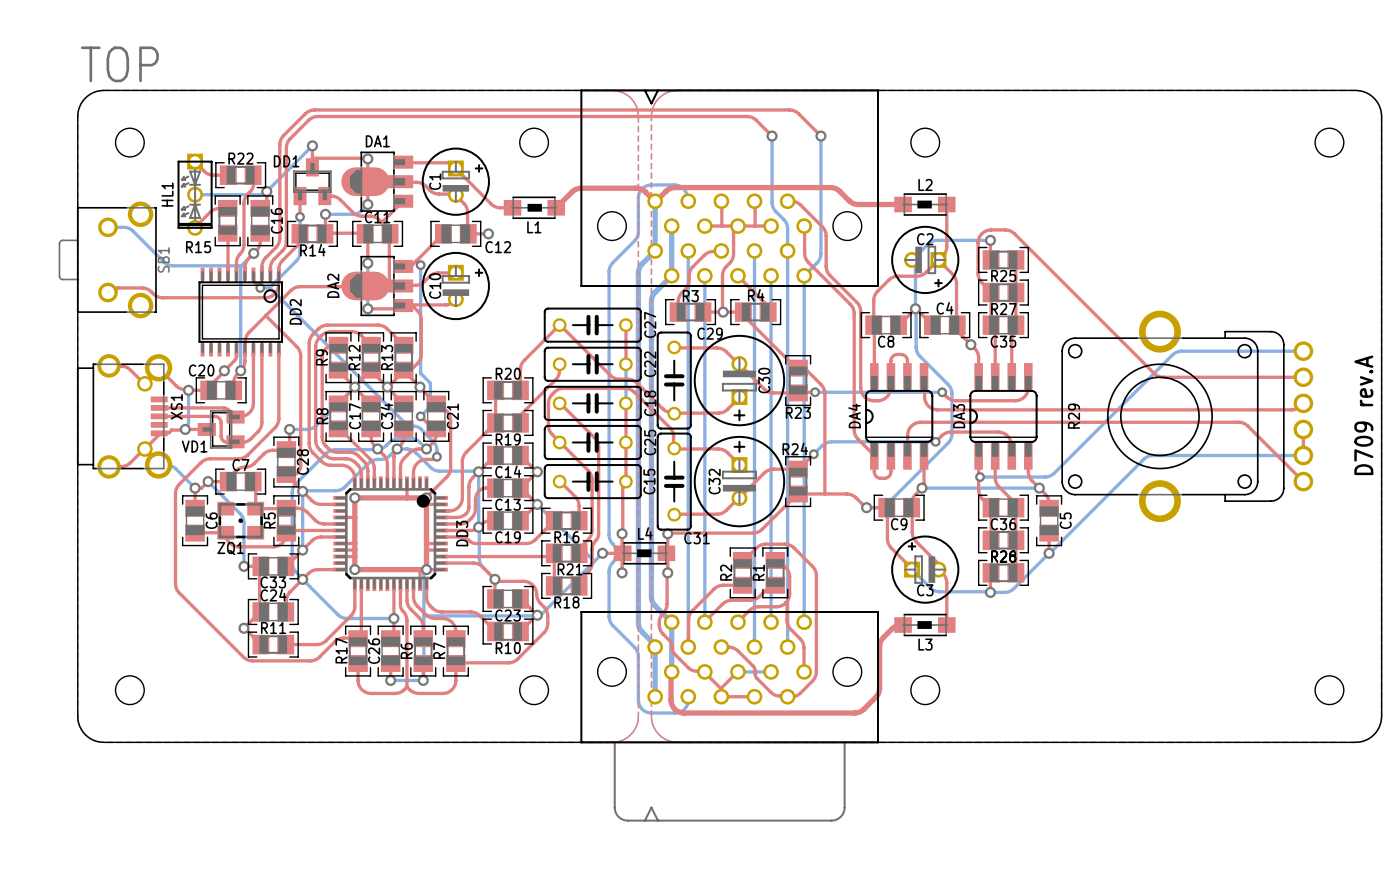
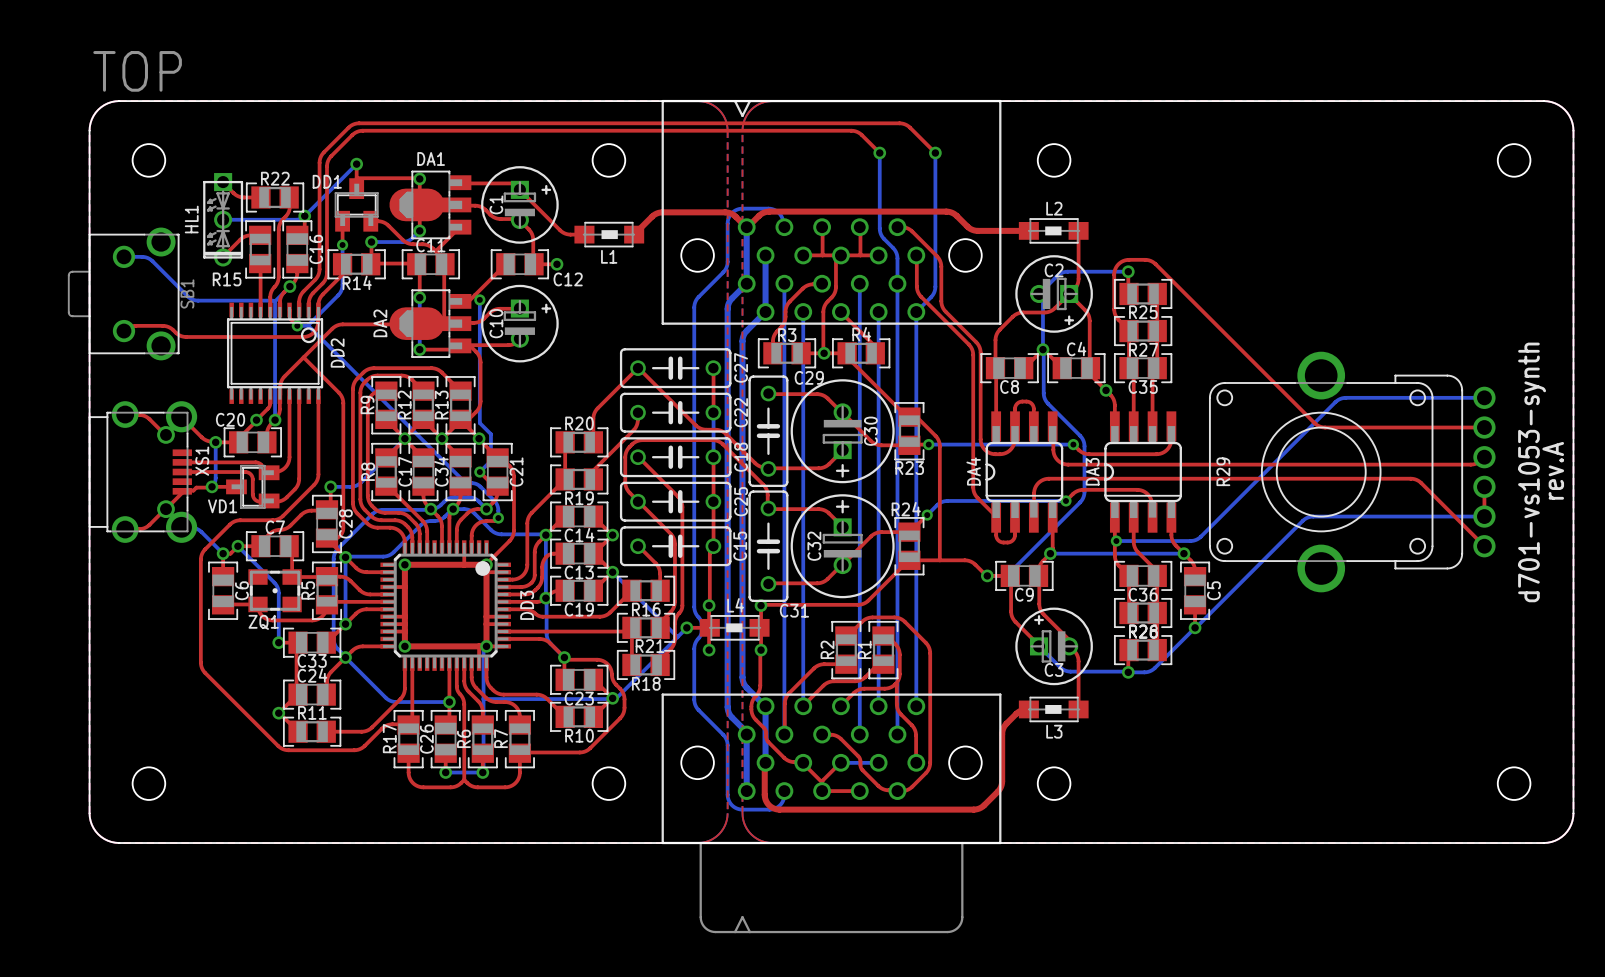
part value: D709 rev.A (1363, 415) -> rev.A (1553, 470)
part text: none -> d701-vs1053-synth (1532, 472)

